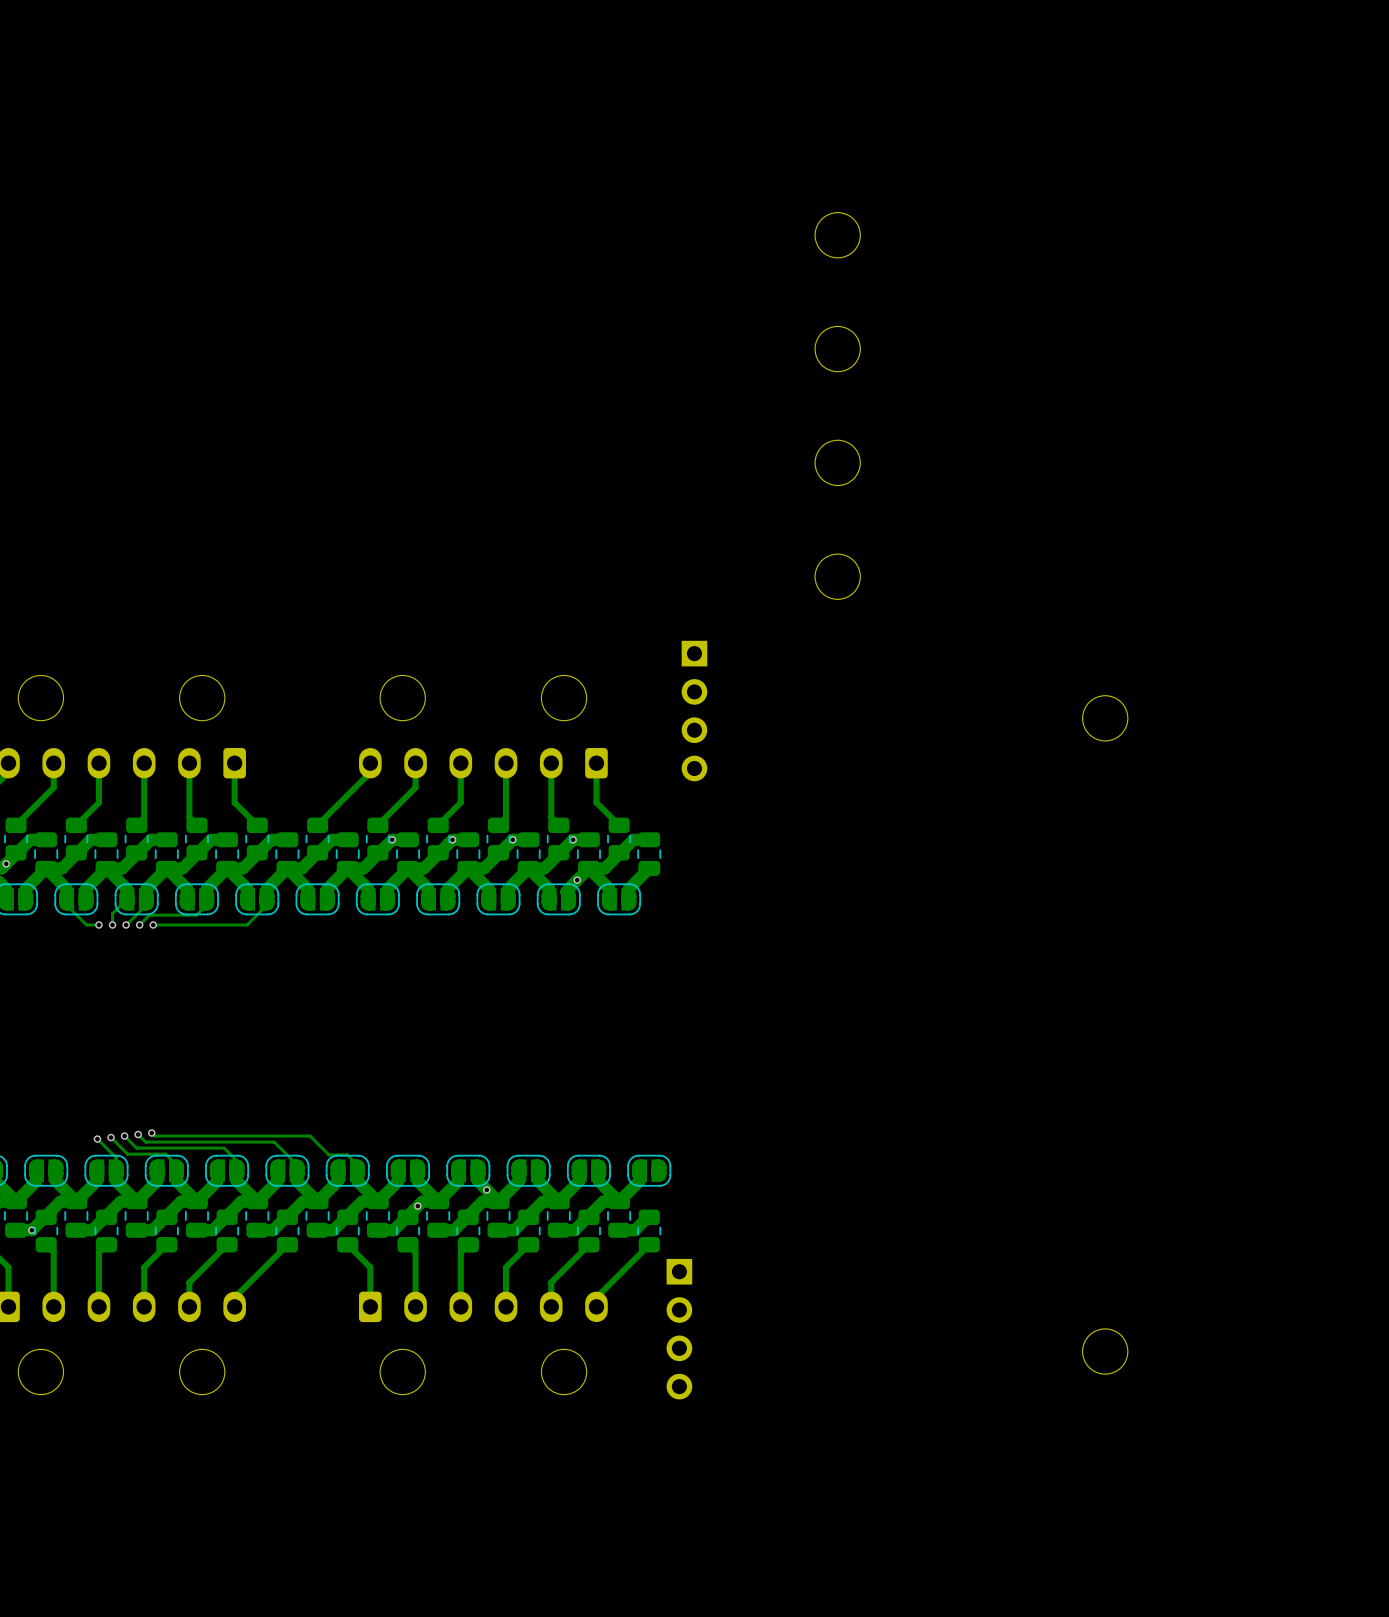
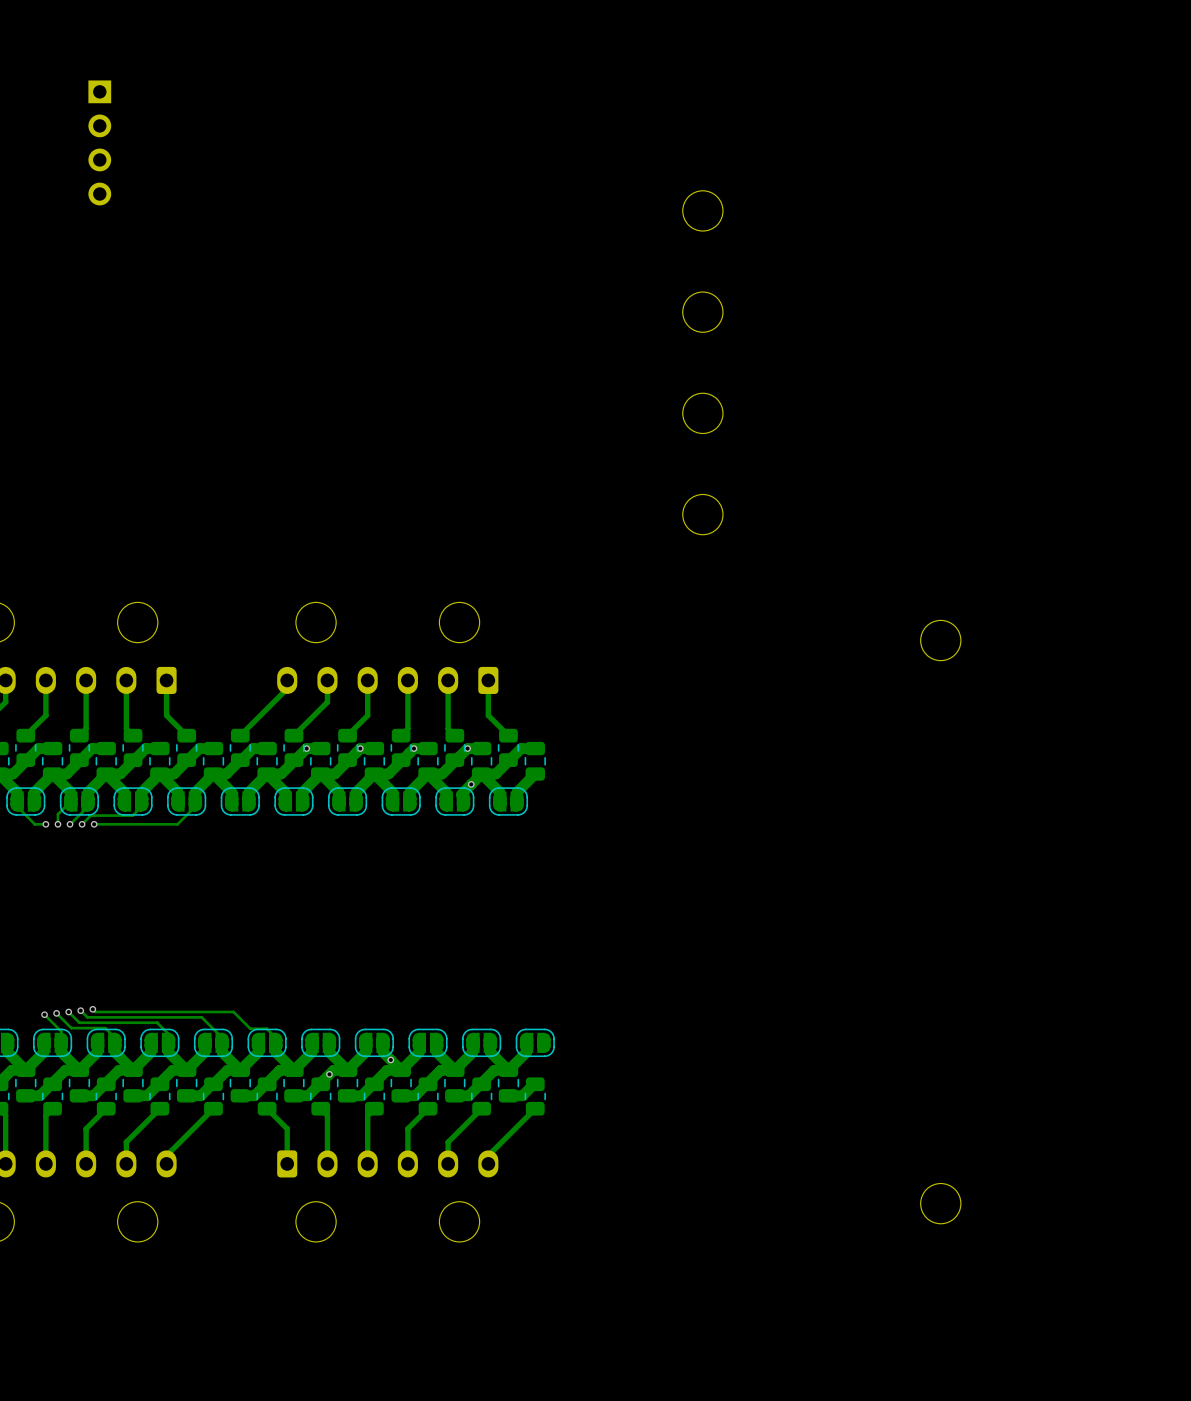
part: none -> (99, 142)
part: (694, 711) -> none
part: (679, 1329) -> none

